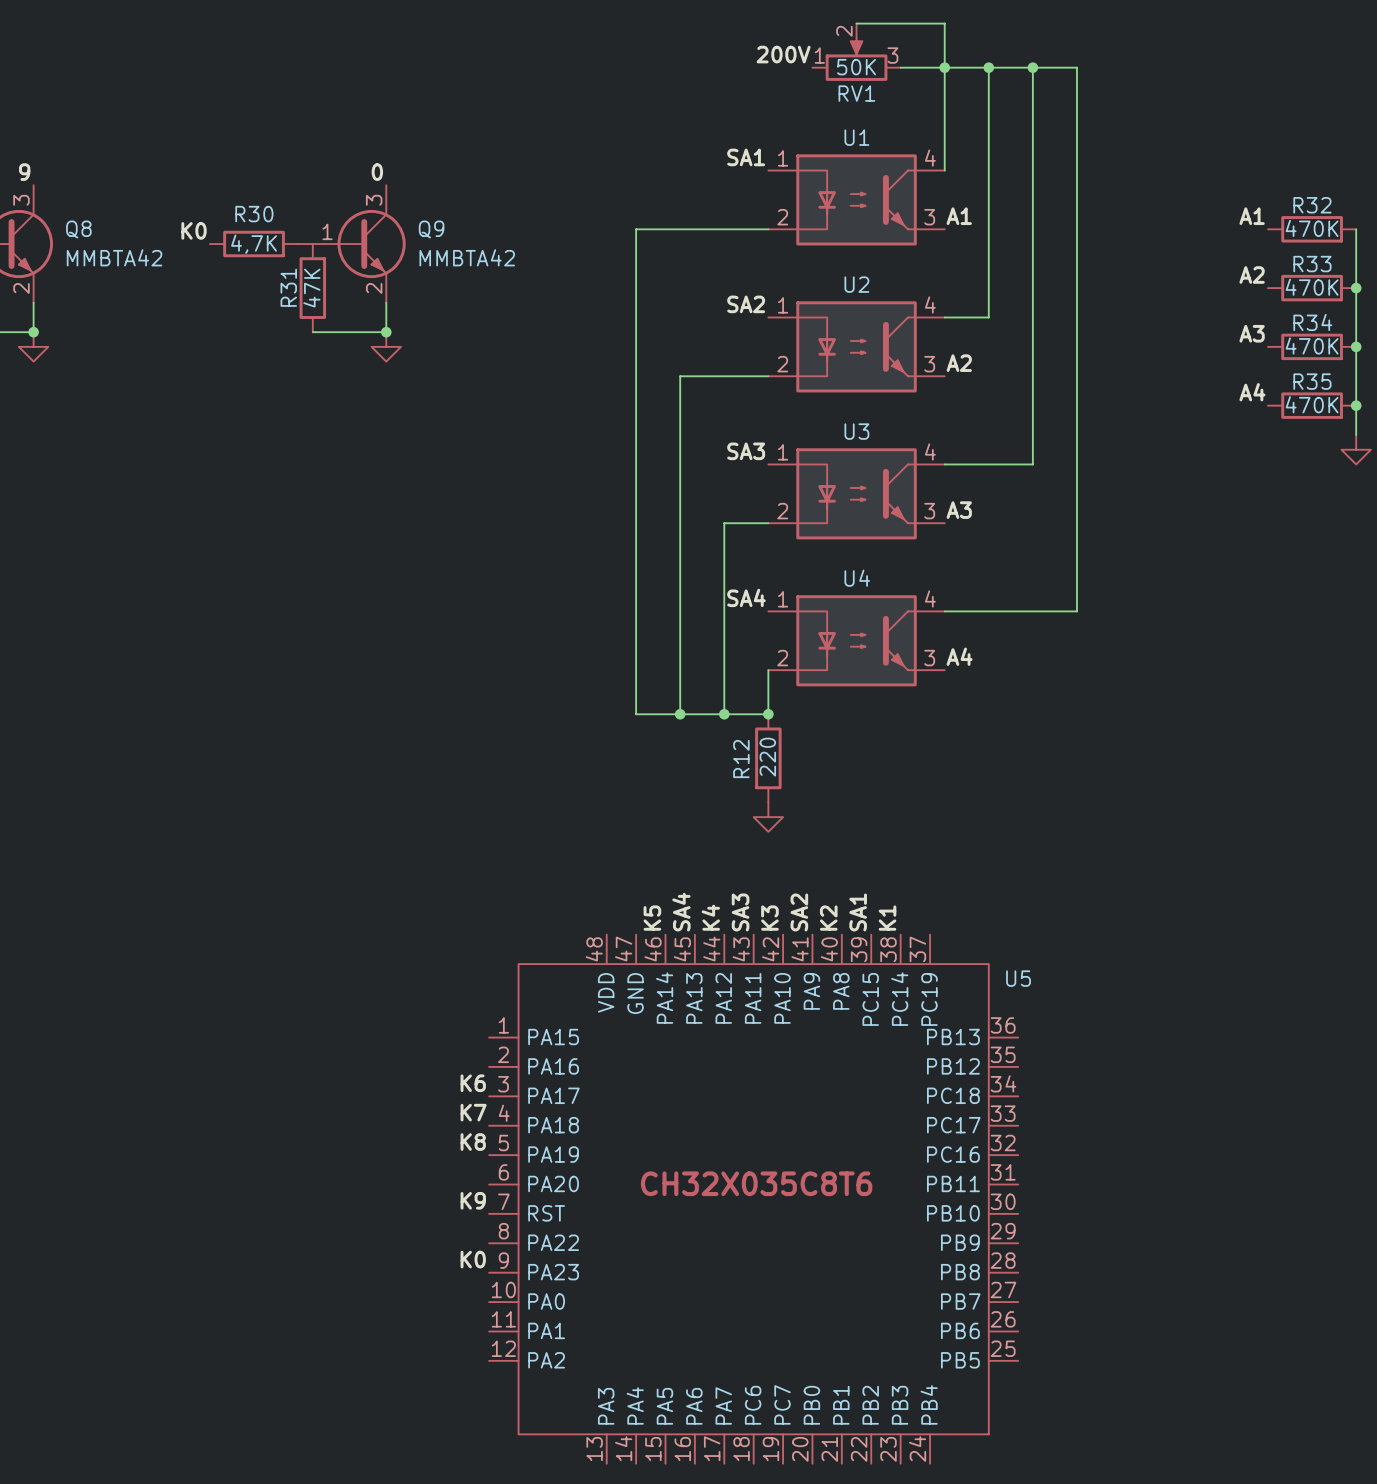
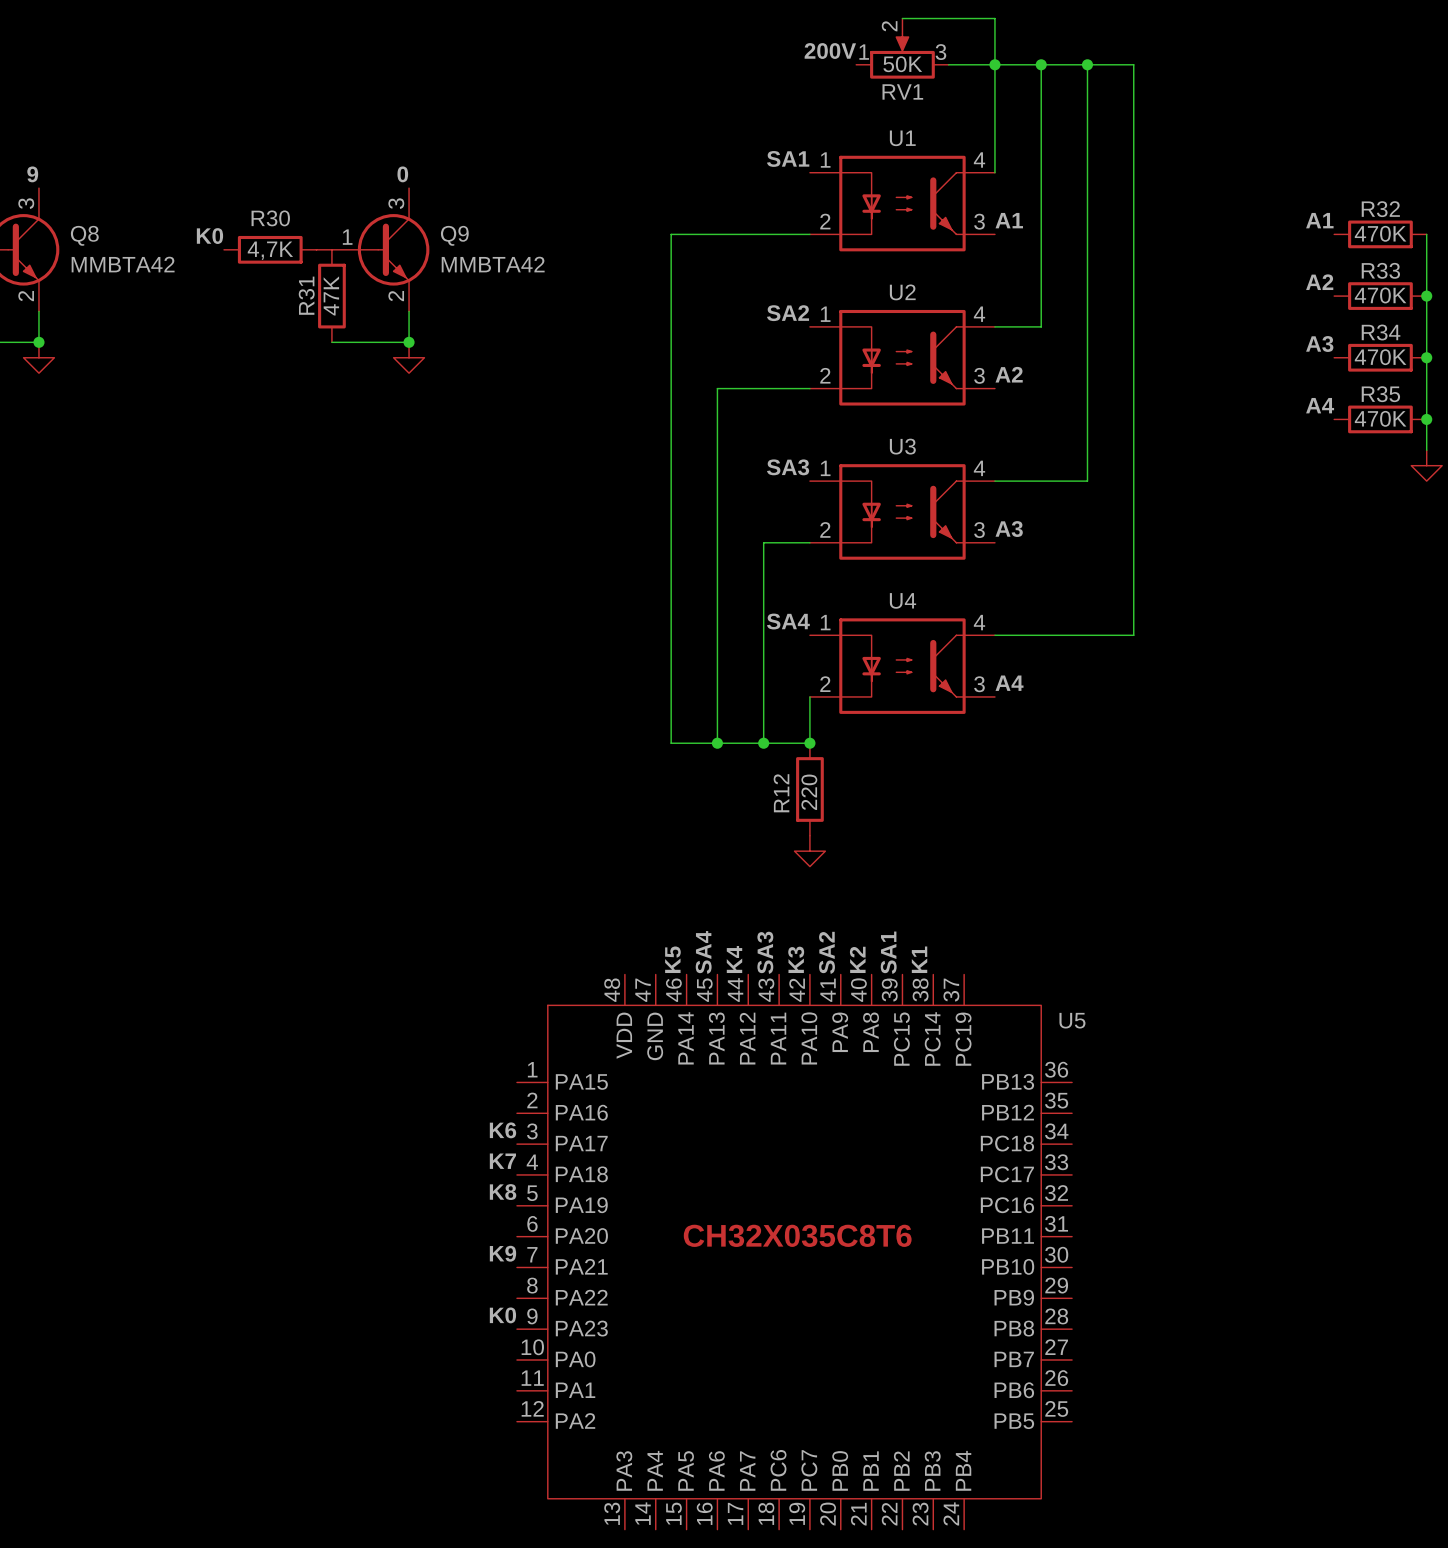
label position: SA4 (681, 912) -> SA4 (703, 952)
label position: SA3 (740, 912) -> SA3 (765, 952)
label position: SA2 (799, 912) -> SA2 (827, 952)
label position: SA1 (858, 912) -> SA1 (888, 952)
label position: K4 (710, 917) -> K4 (734, 959)
label position: K5 (652, 918) -> K5 (672, 959)
label position: K3 (769, 918) -> K3 (796, 959)
label position: K2 (828, 918) -> K2 (857, 959)
label position: K1 (887, 918) -> K1 (919, 959)
U5 symbol: [489, 934, 1019, 1464] -> [516, 974, 1073, 1530]

